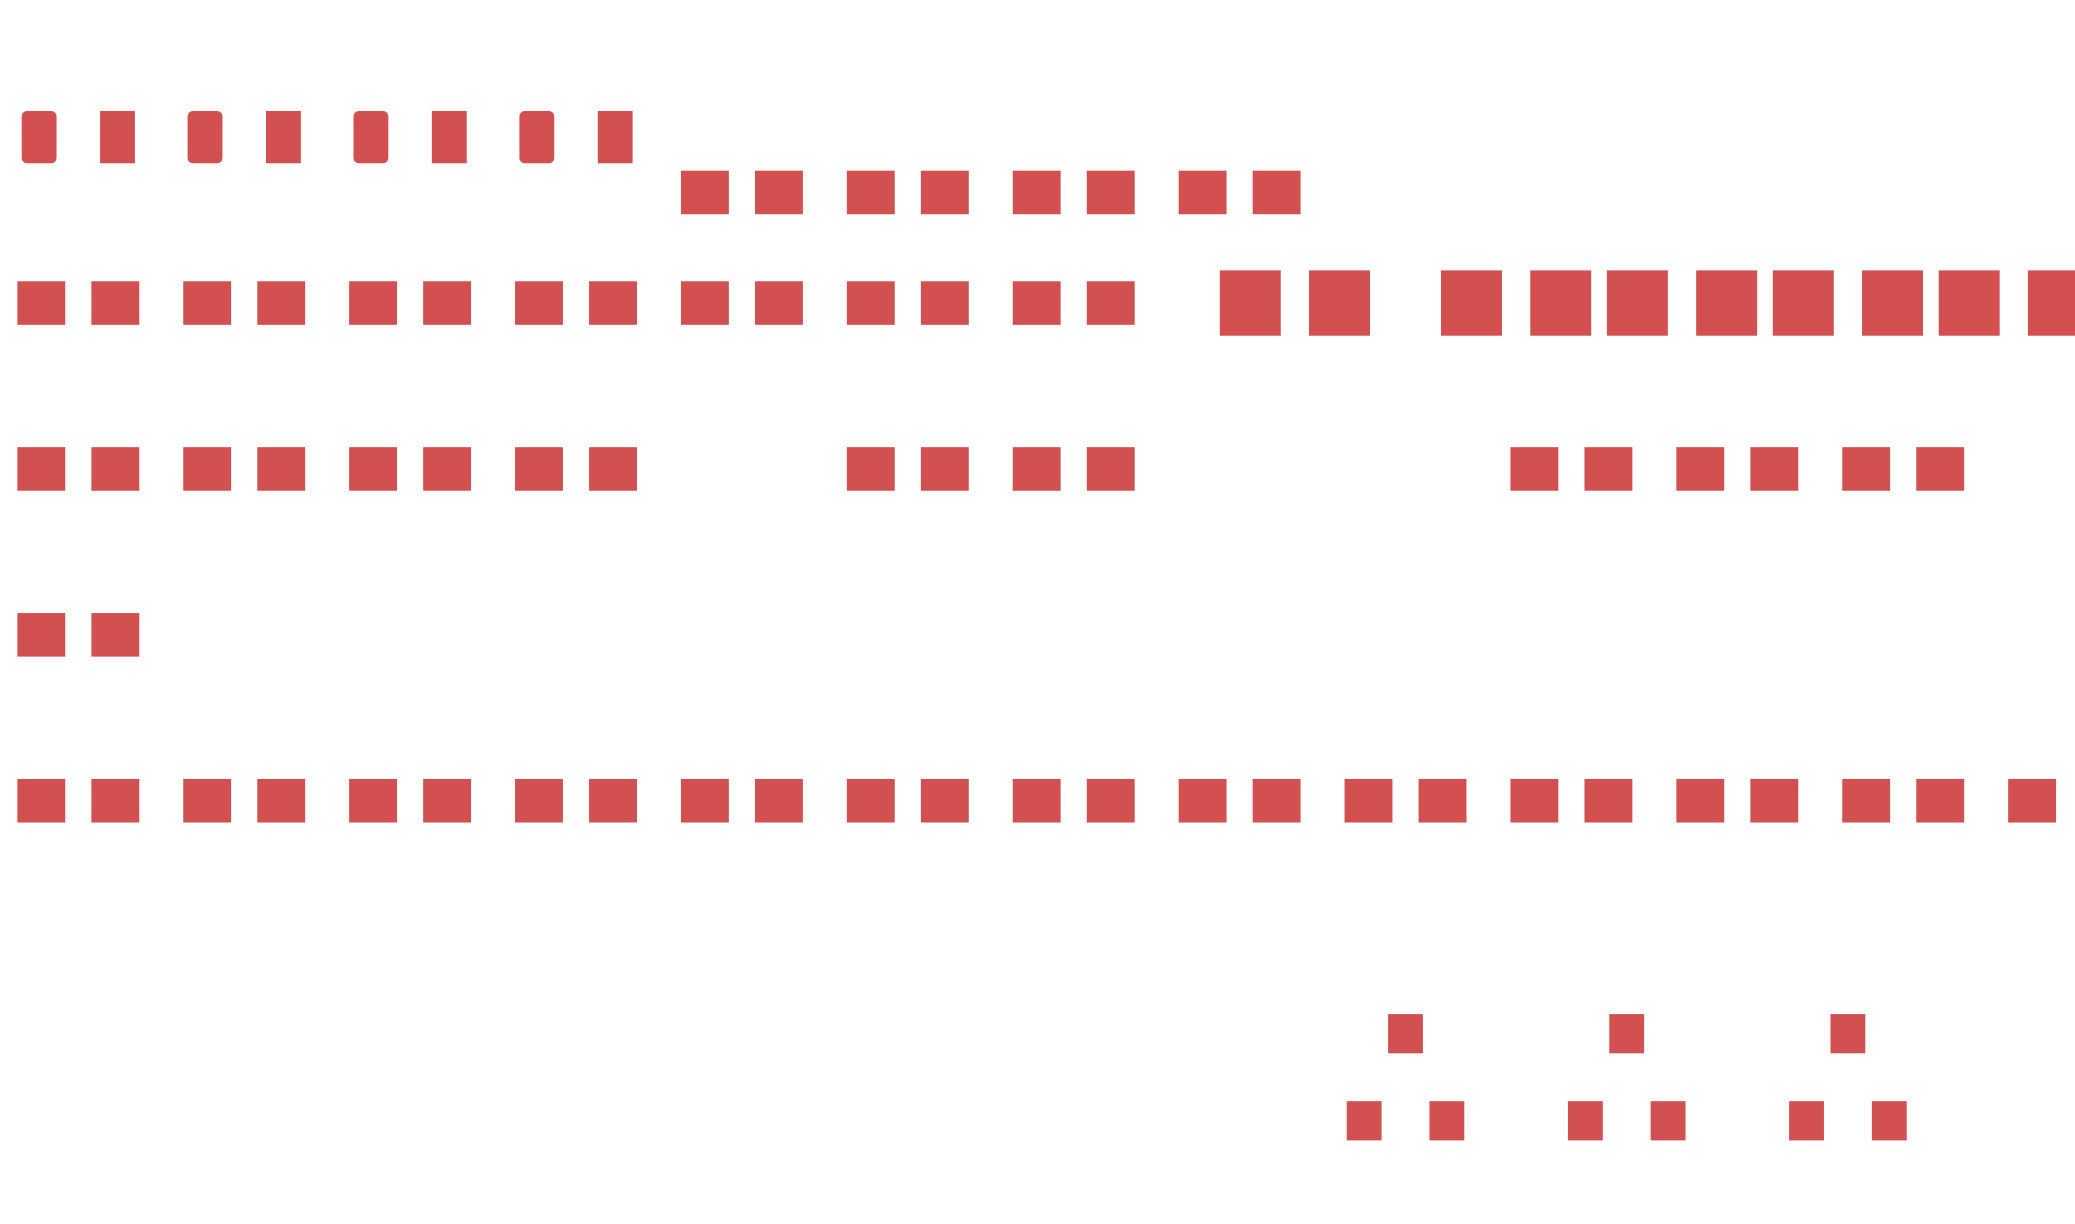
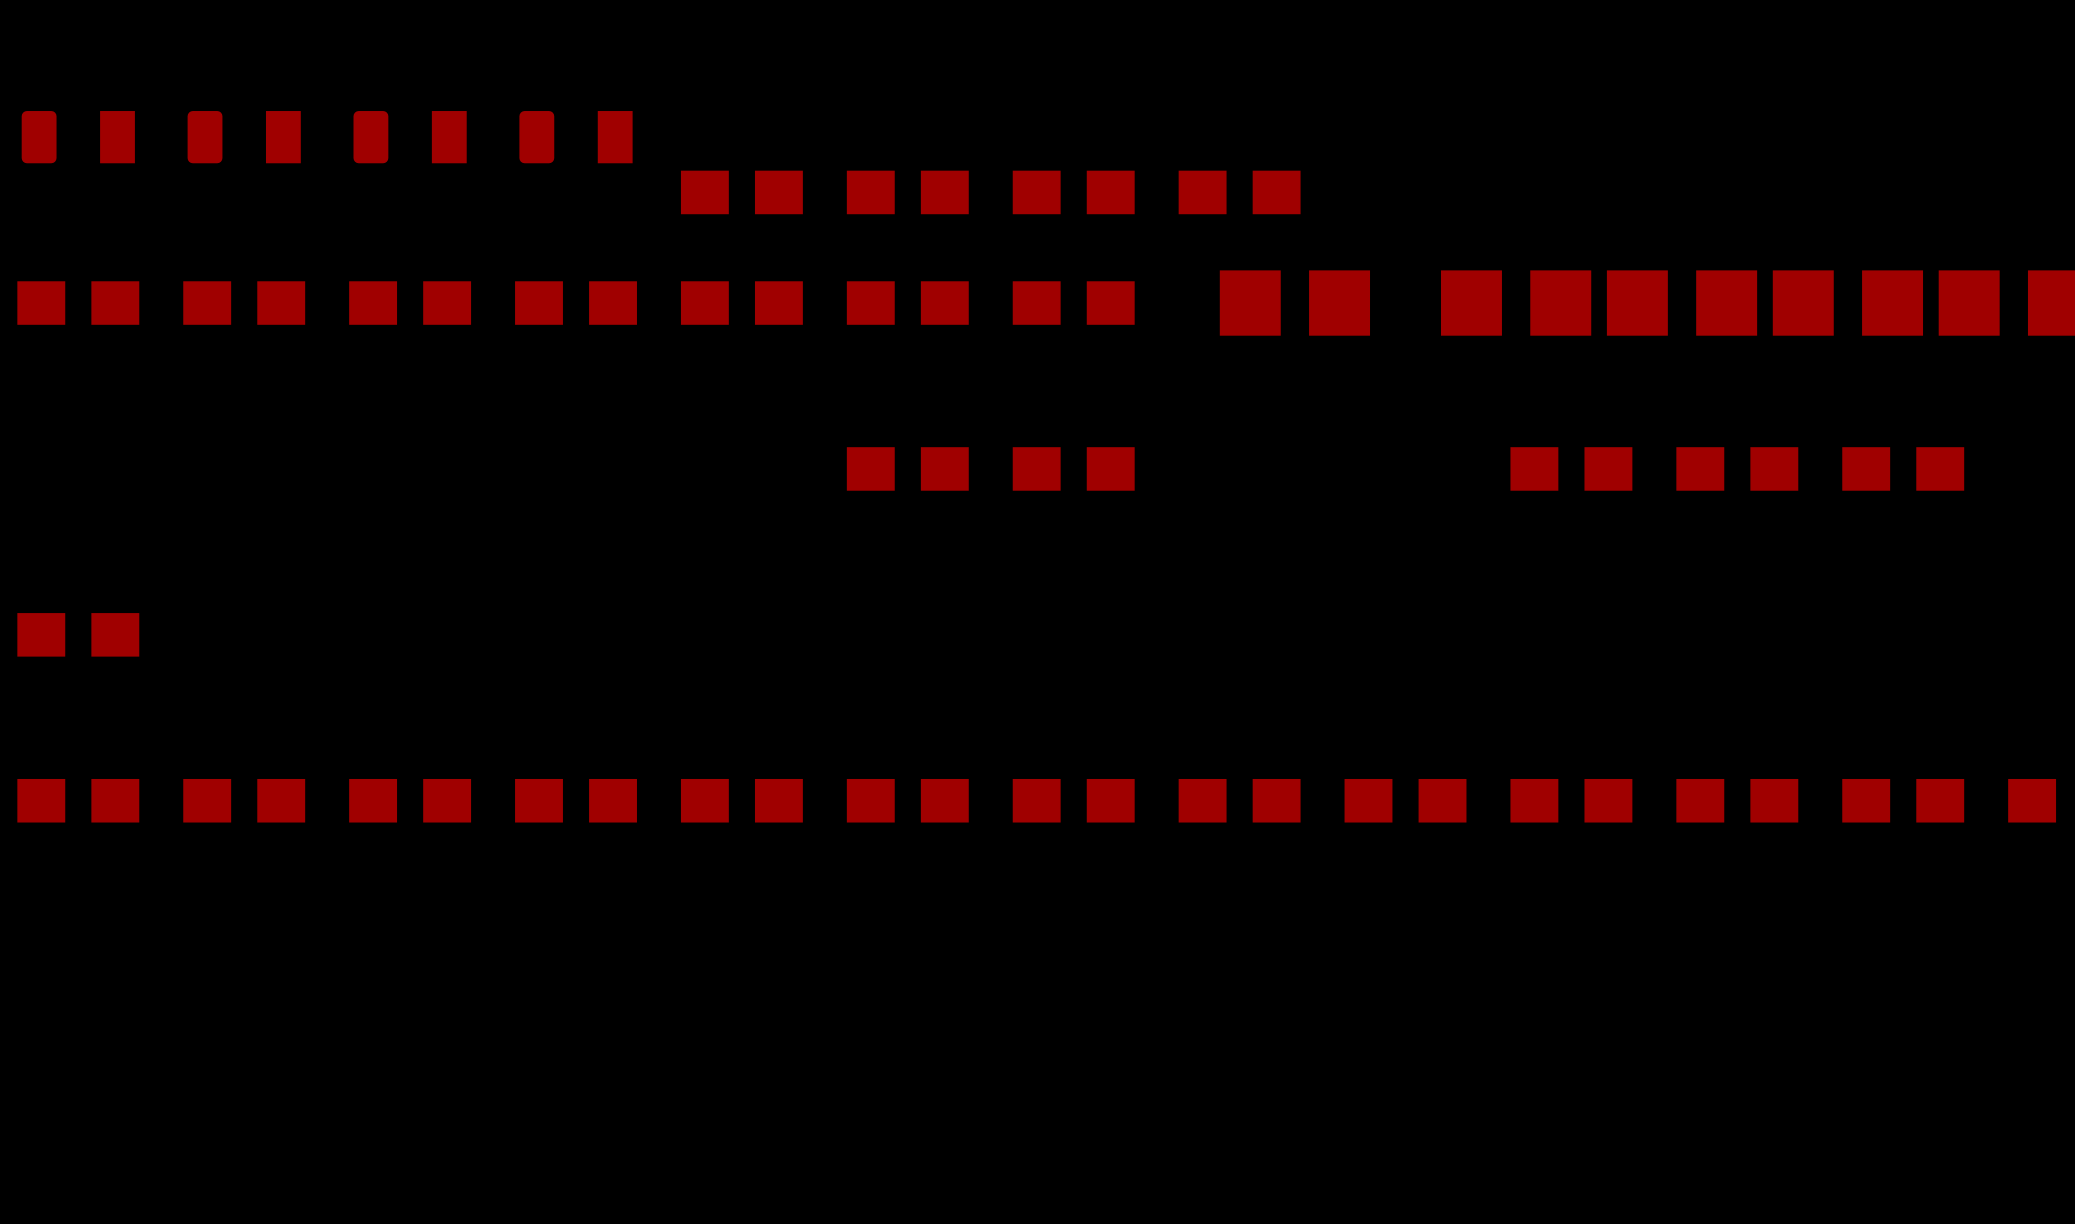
part: (78, 468) -> none
part: (244, 468) -> none
part: (410, 468) -> none
part: (576, 468) -> none
part: (1405, 1077) -> none
part: (1626, 1077) -> none
part: (1847, 1077) -> none

